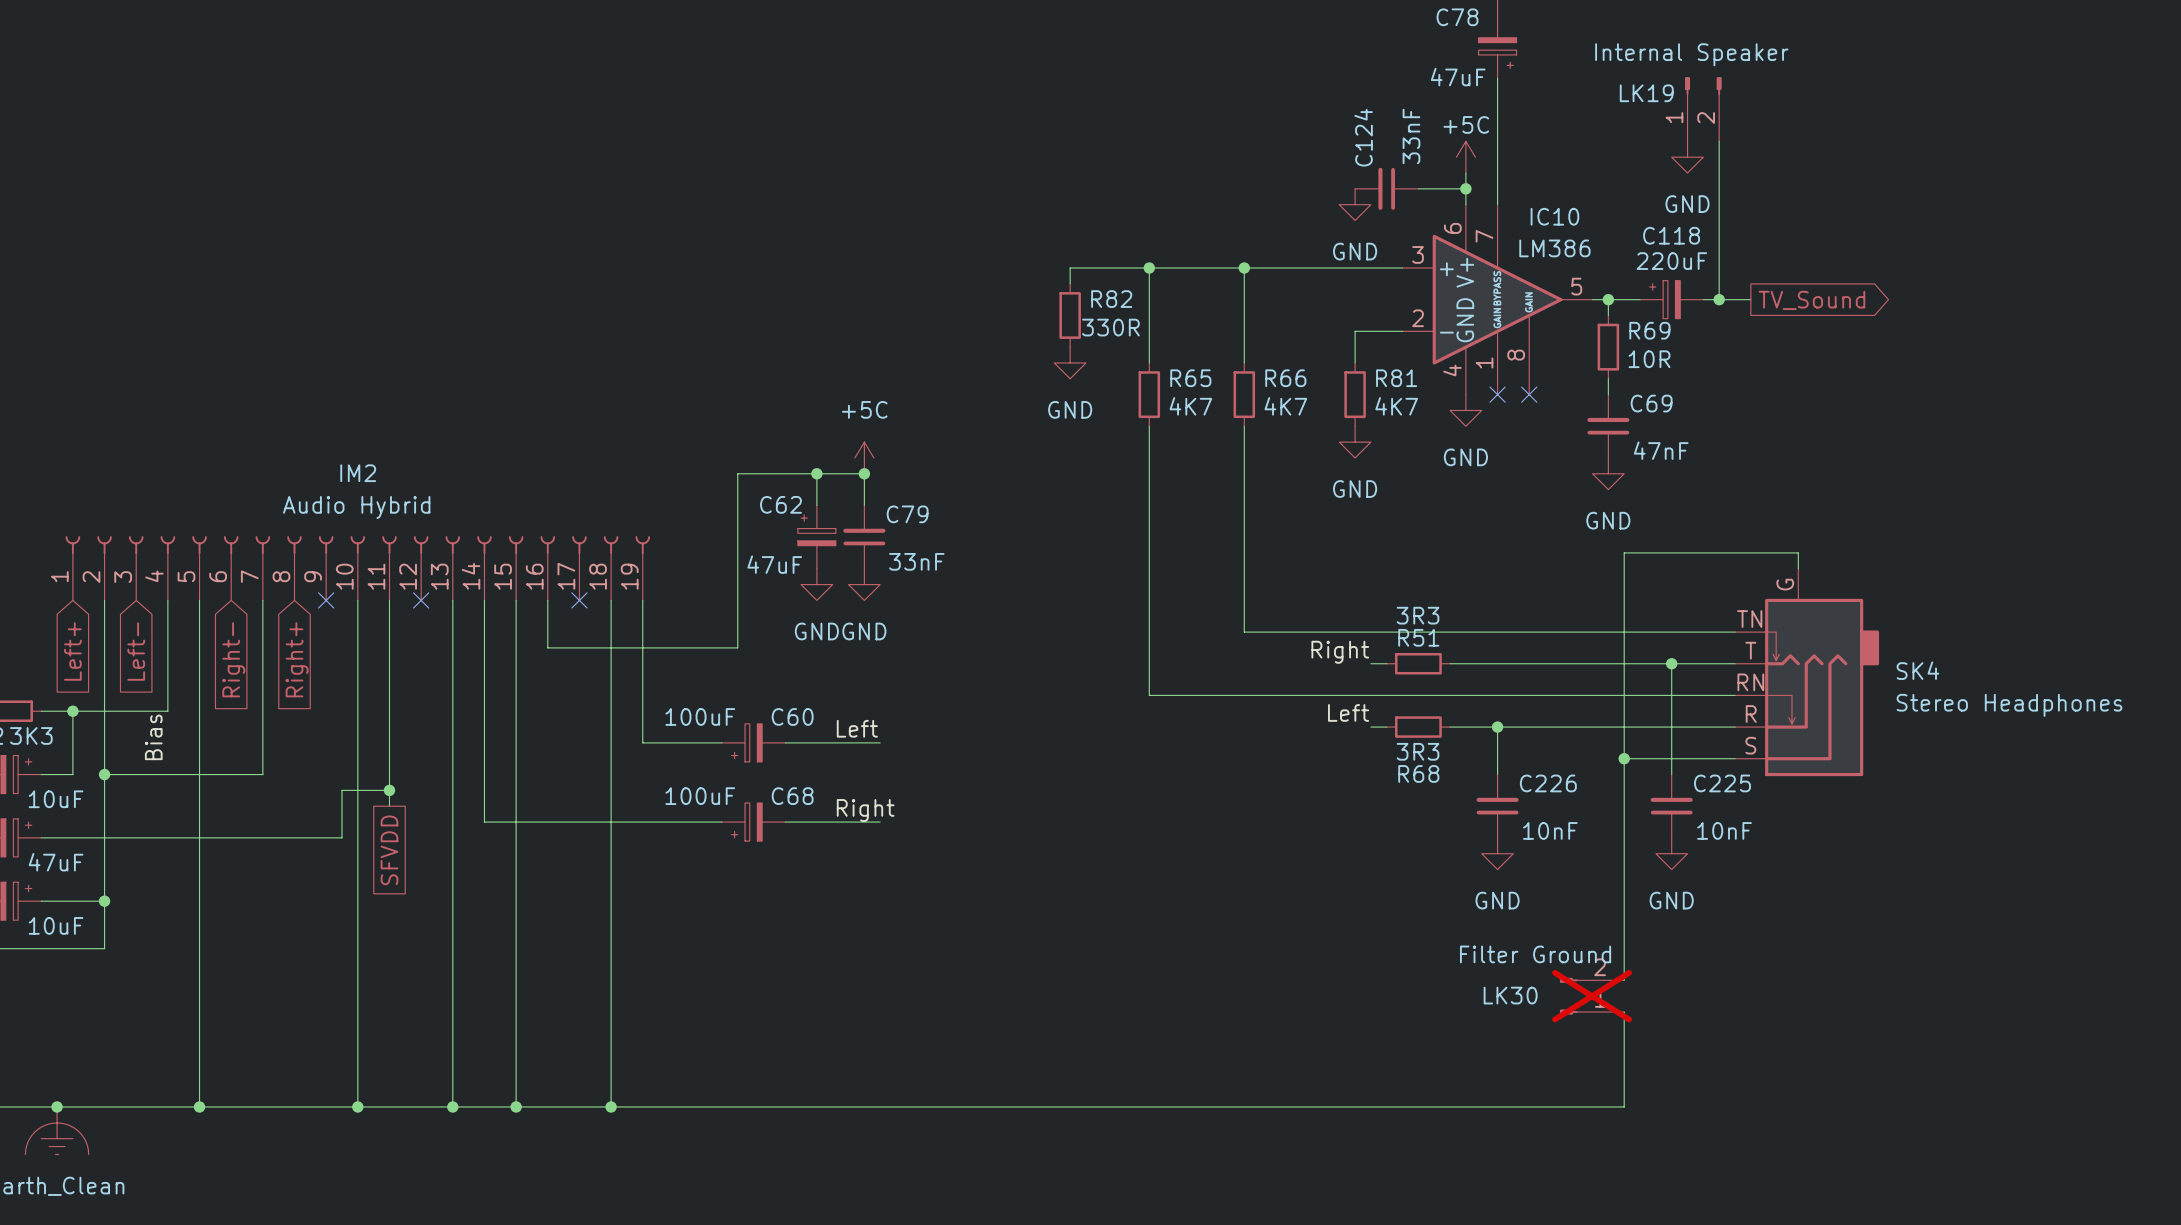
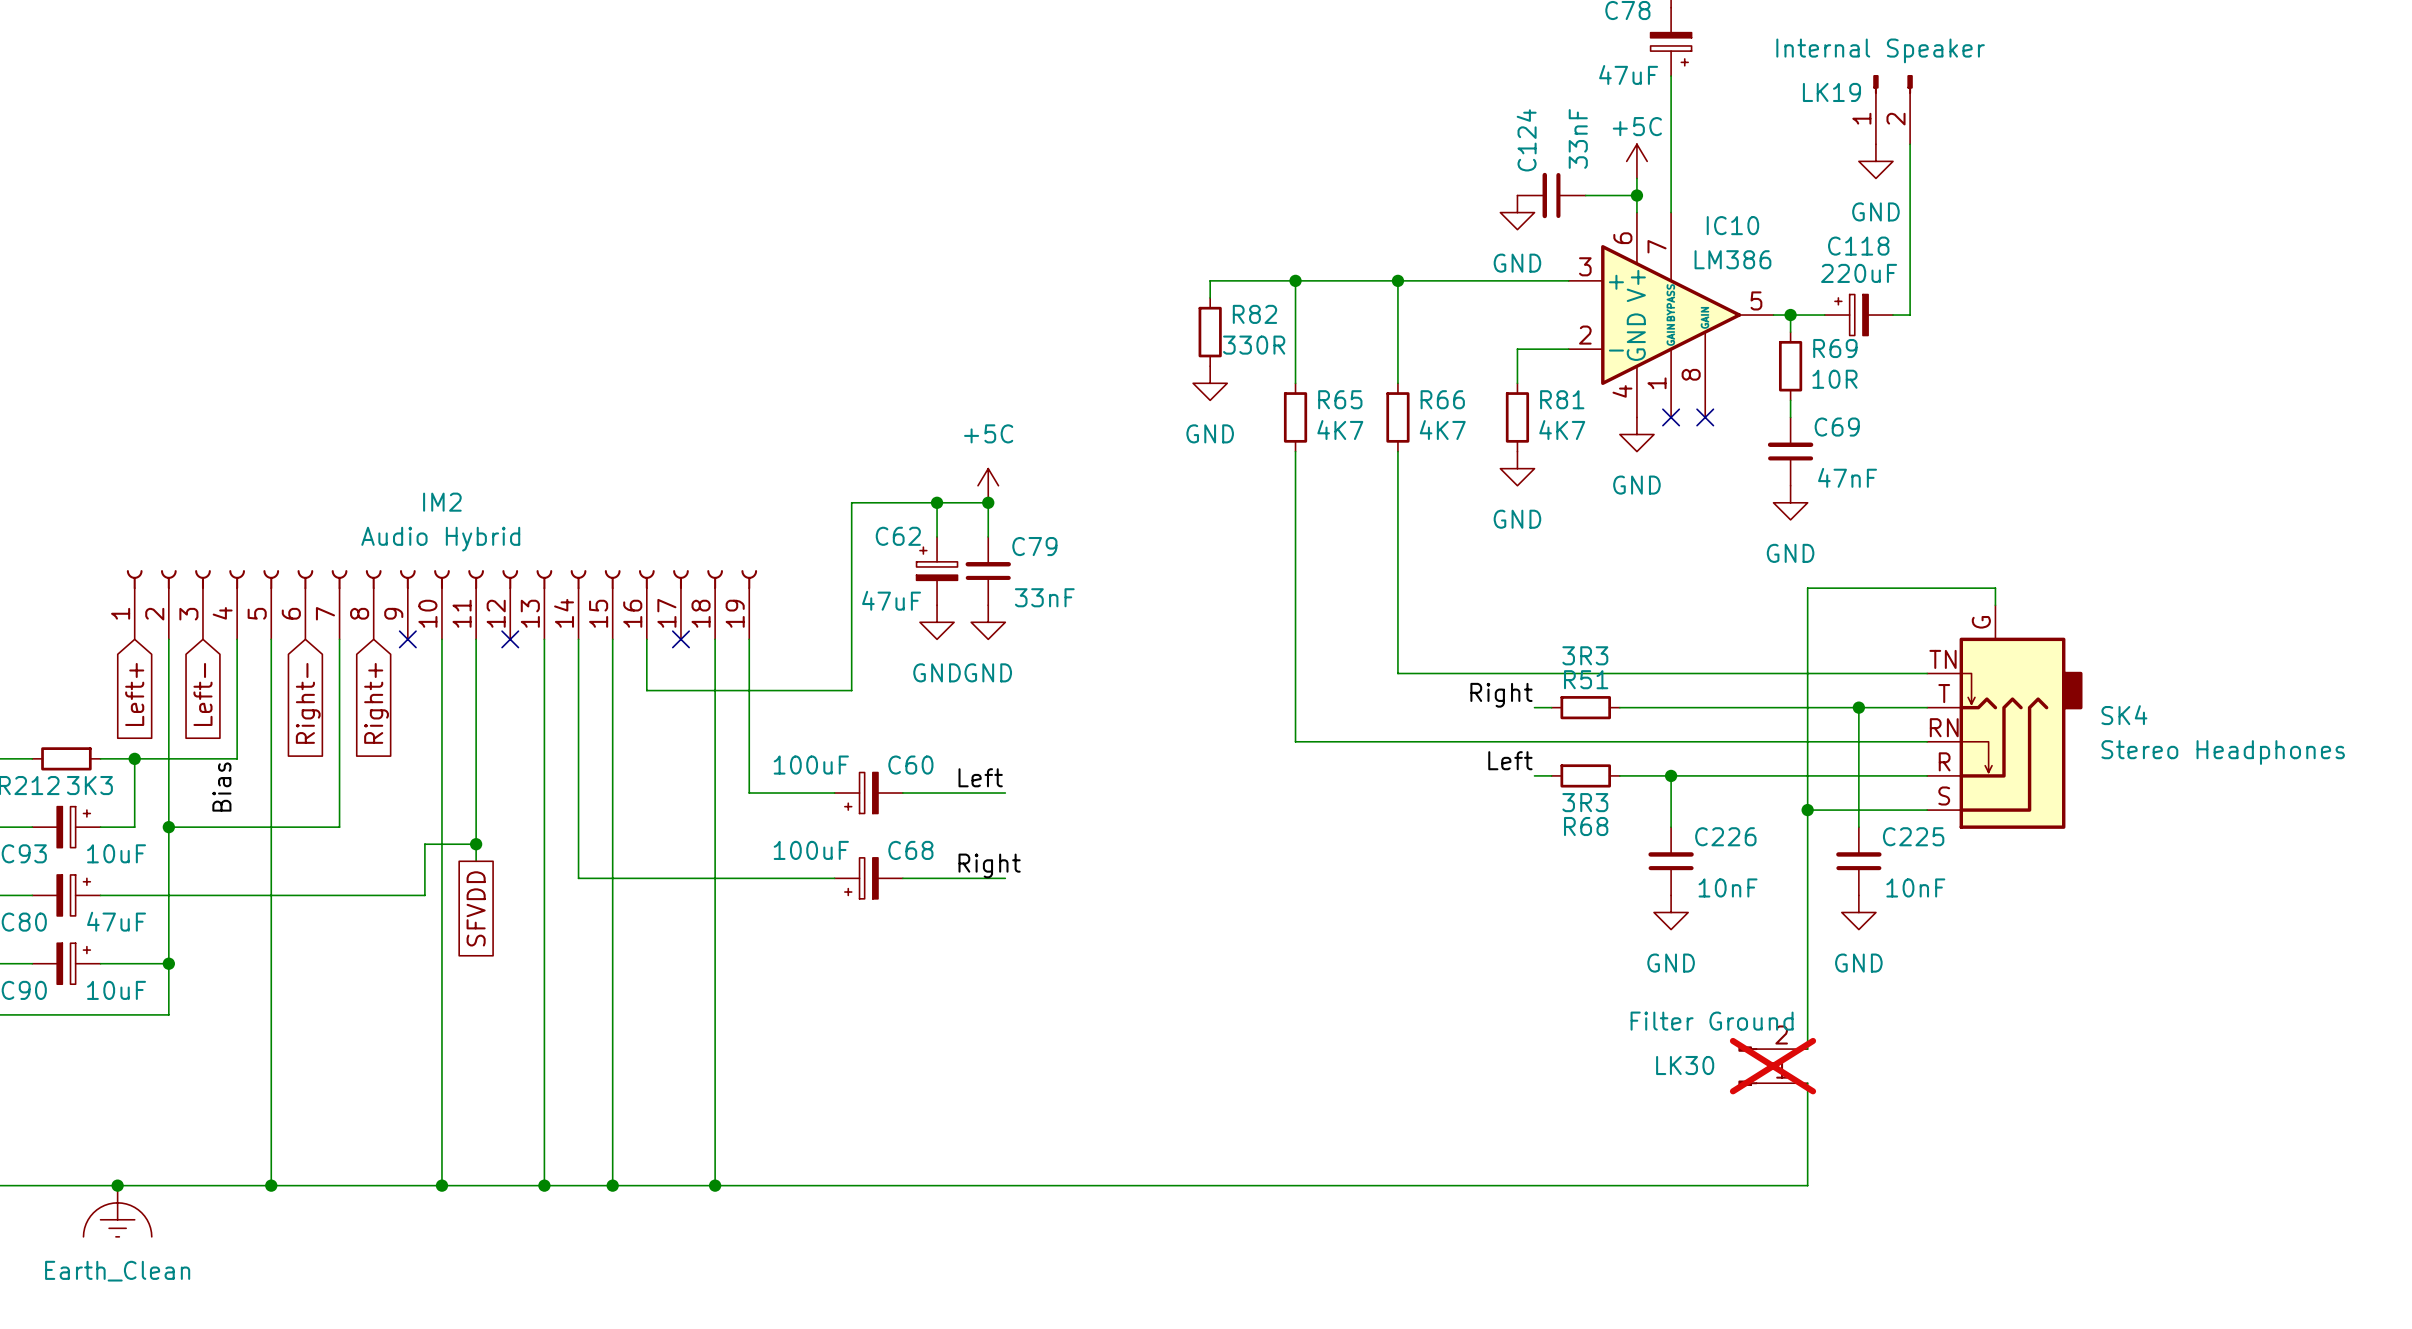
wire: (1719, 299) (1750, 299) -> none
junction: (1719, 299) -> none
global label: TV_Sound (1811, 300) -> none

